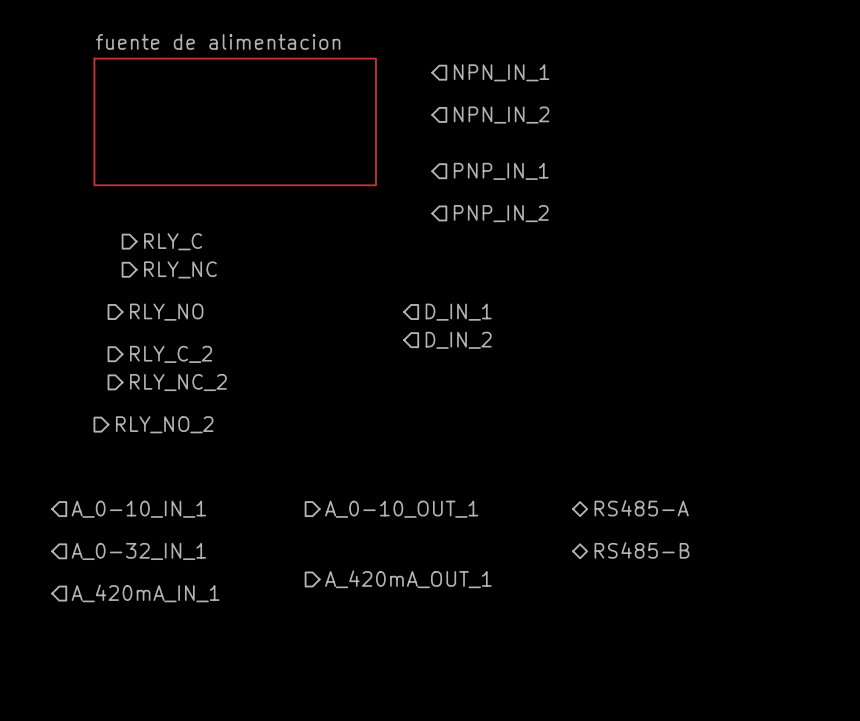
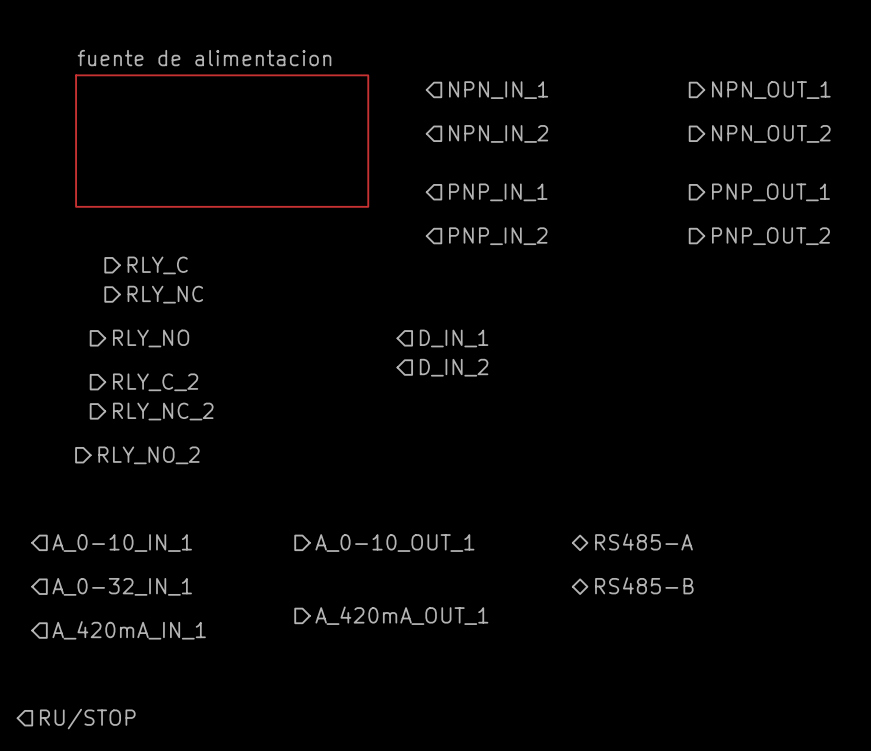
hierarchical label: none -> NPN_OUT_1 (771, 90)
hierarchical label: none -> NPN_OUT_2 (771, 133)
hierarchical label: none -> PNP_OUT_1 (770, 192)
hierarchical label: none -> PNP_OUT_2 (770, 236)
hierarchical label: none -> RU/STOP (87, 719)

